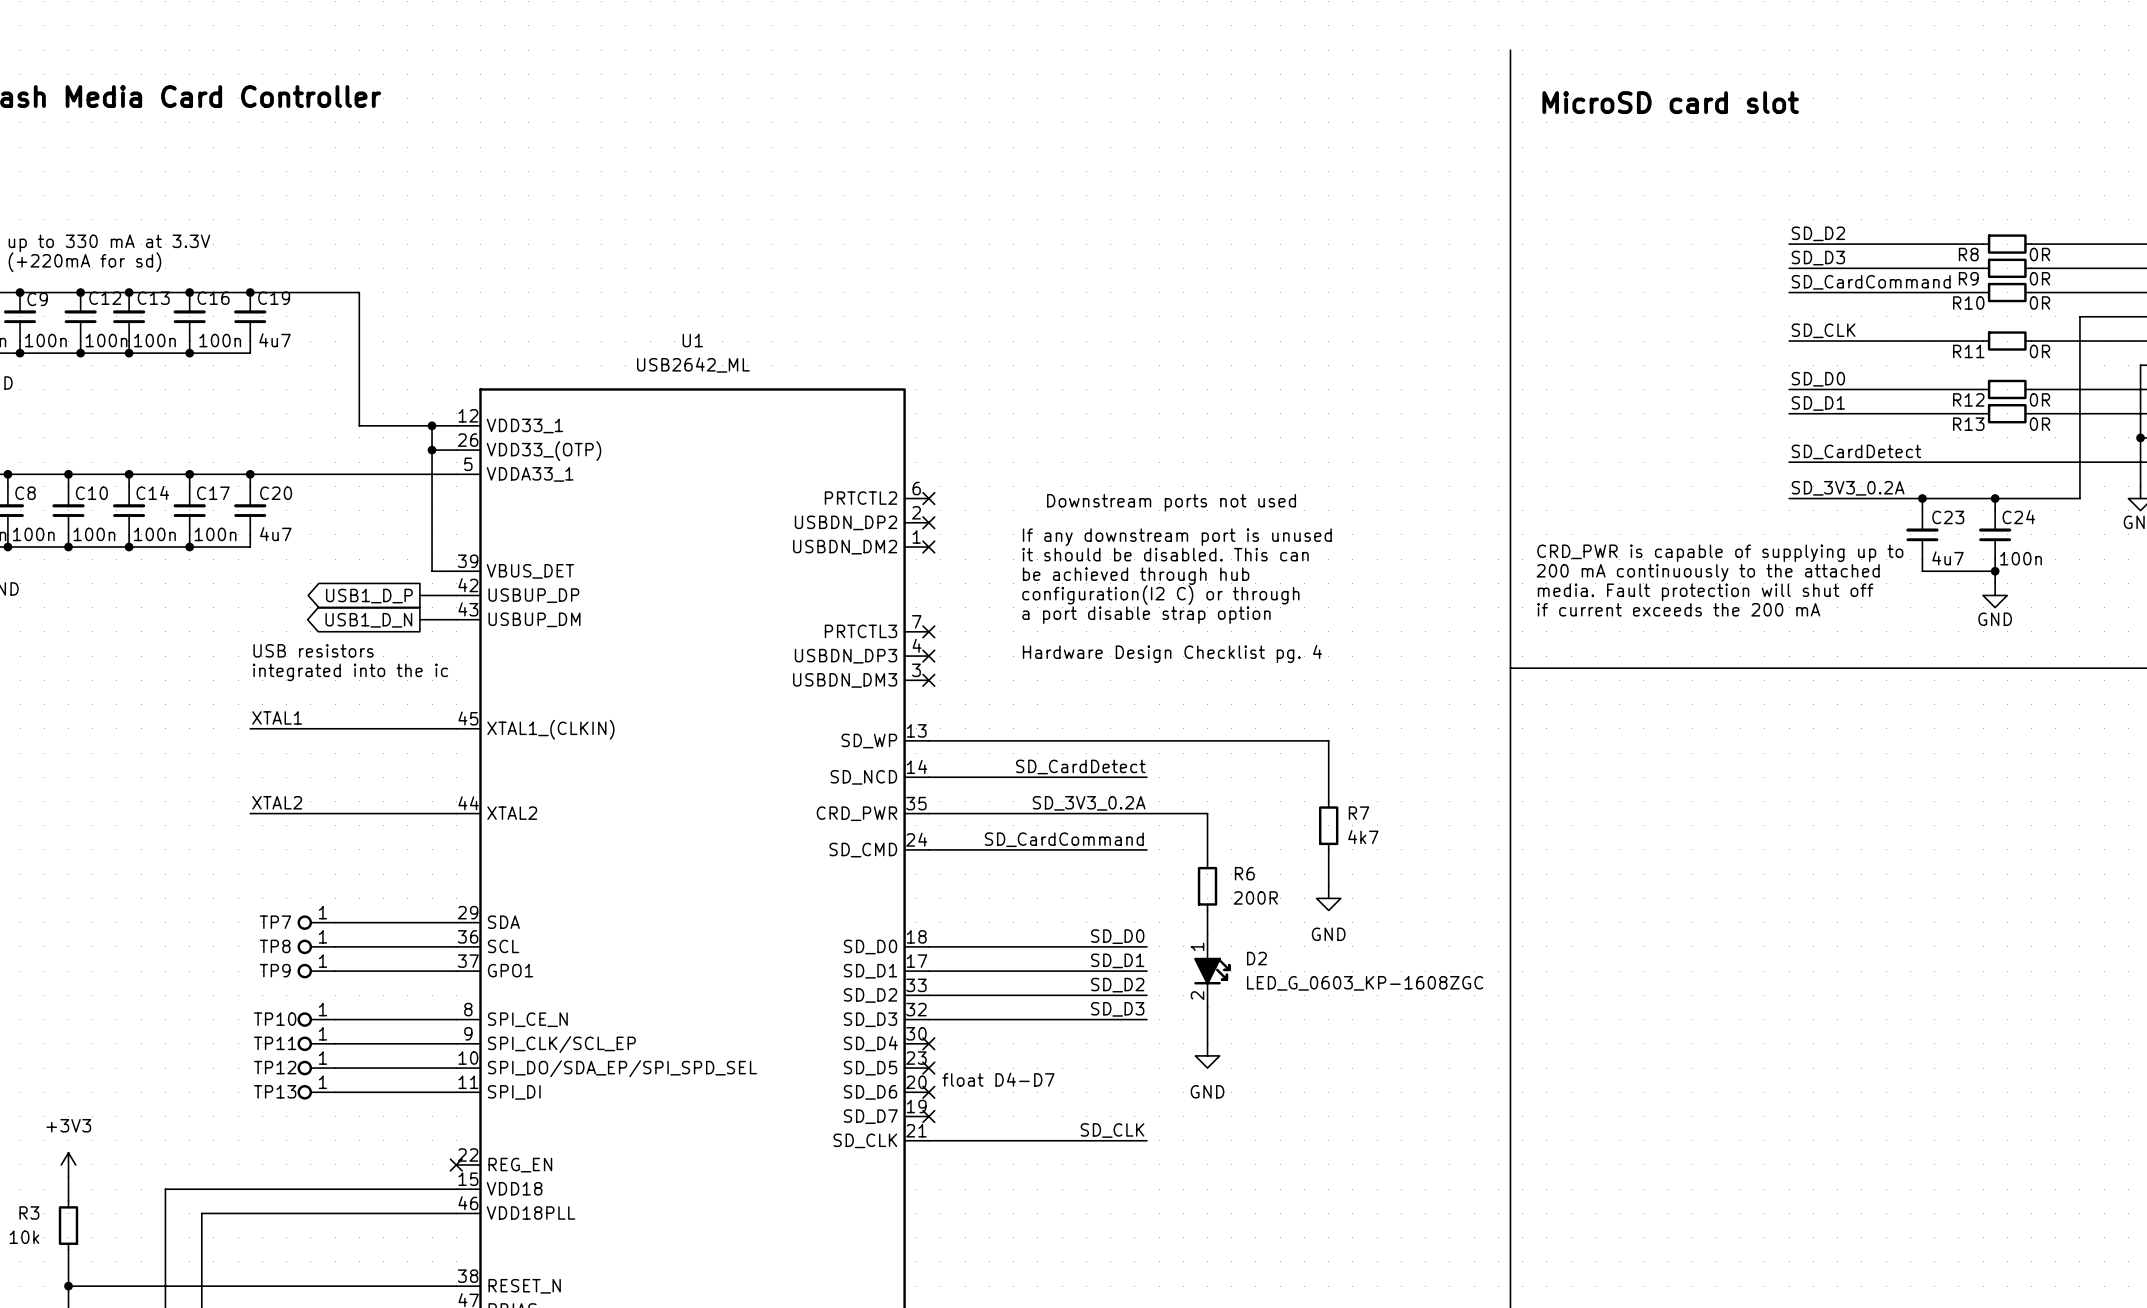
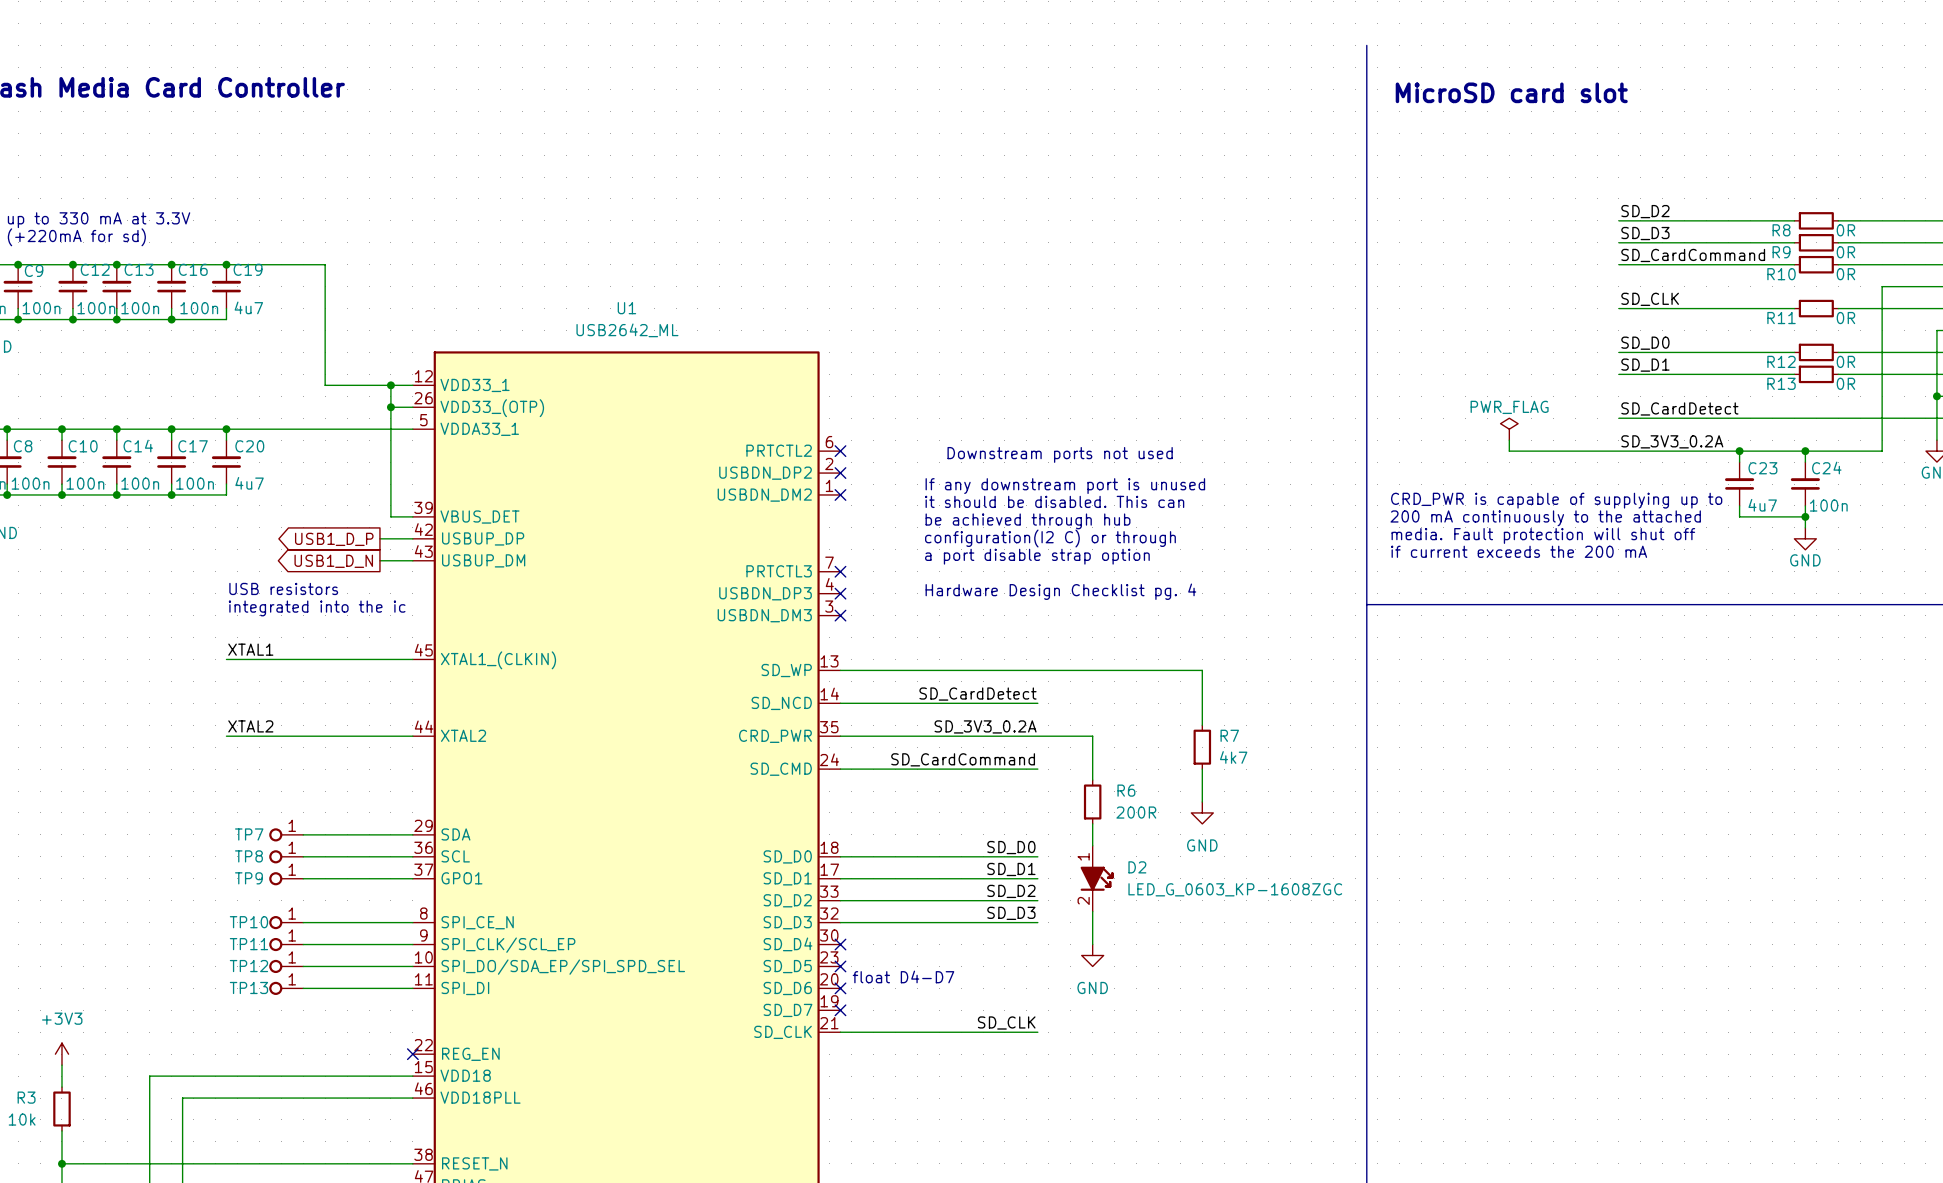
power symbol: none -> PWR_FLAG (1509, 429)
wire: none -> (1509, 440) (1509, 451) (1618, 451)

